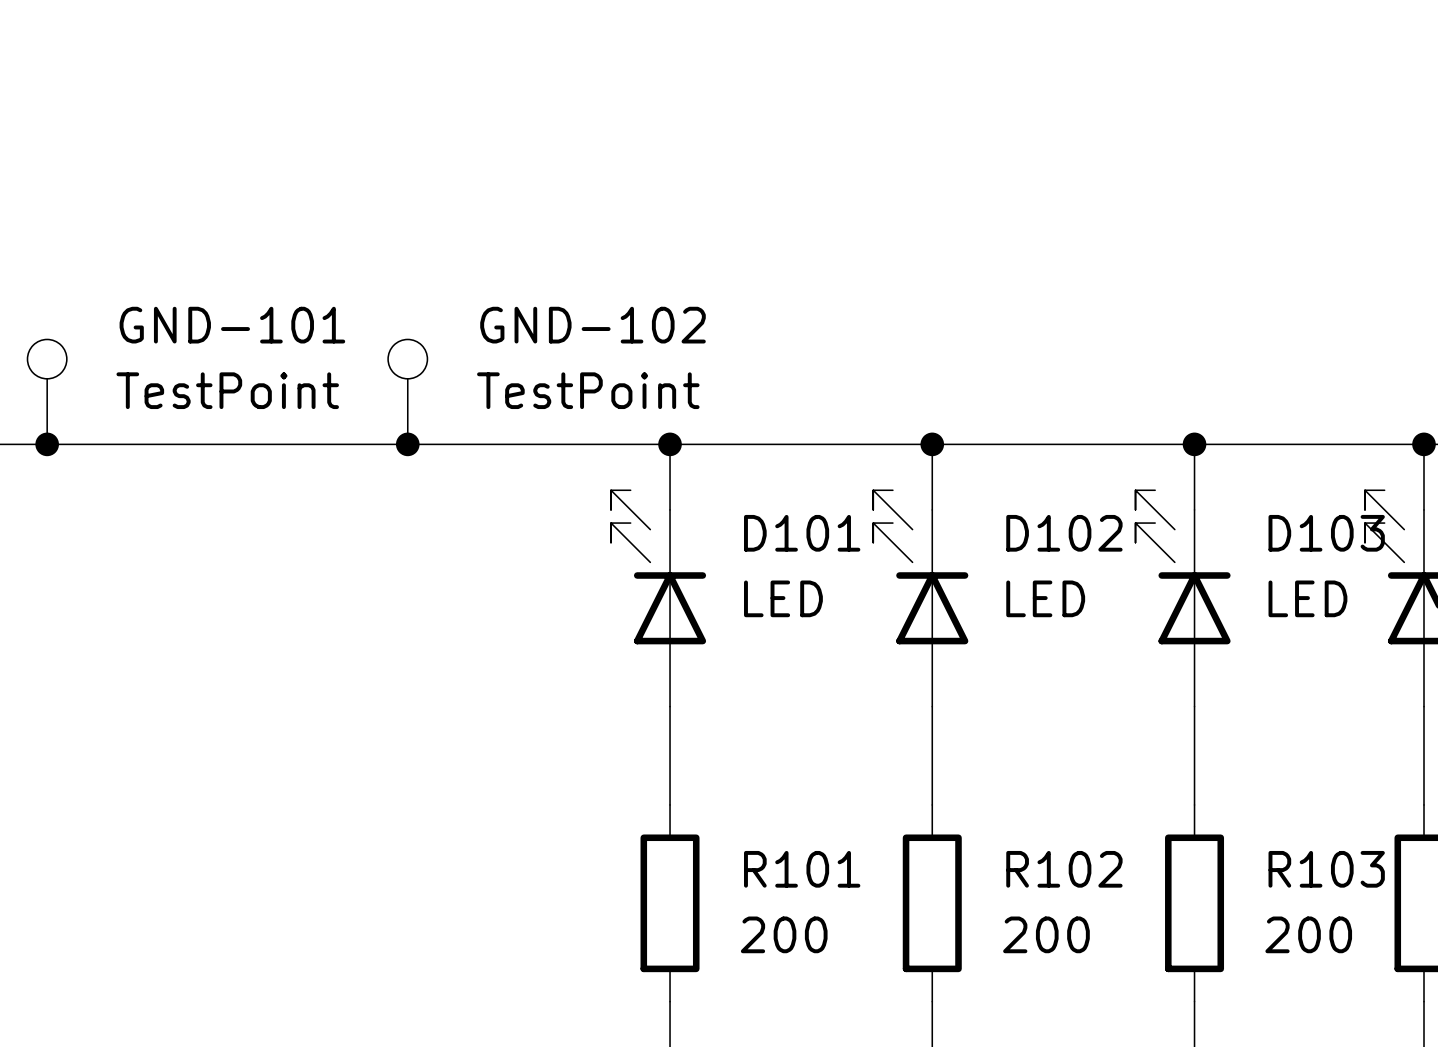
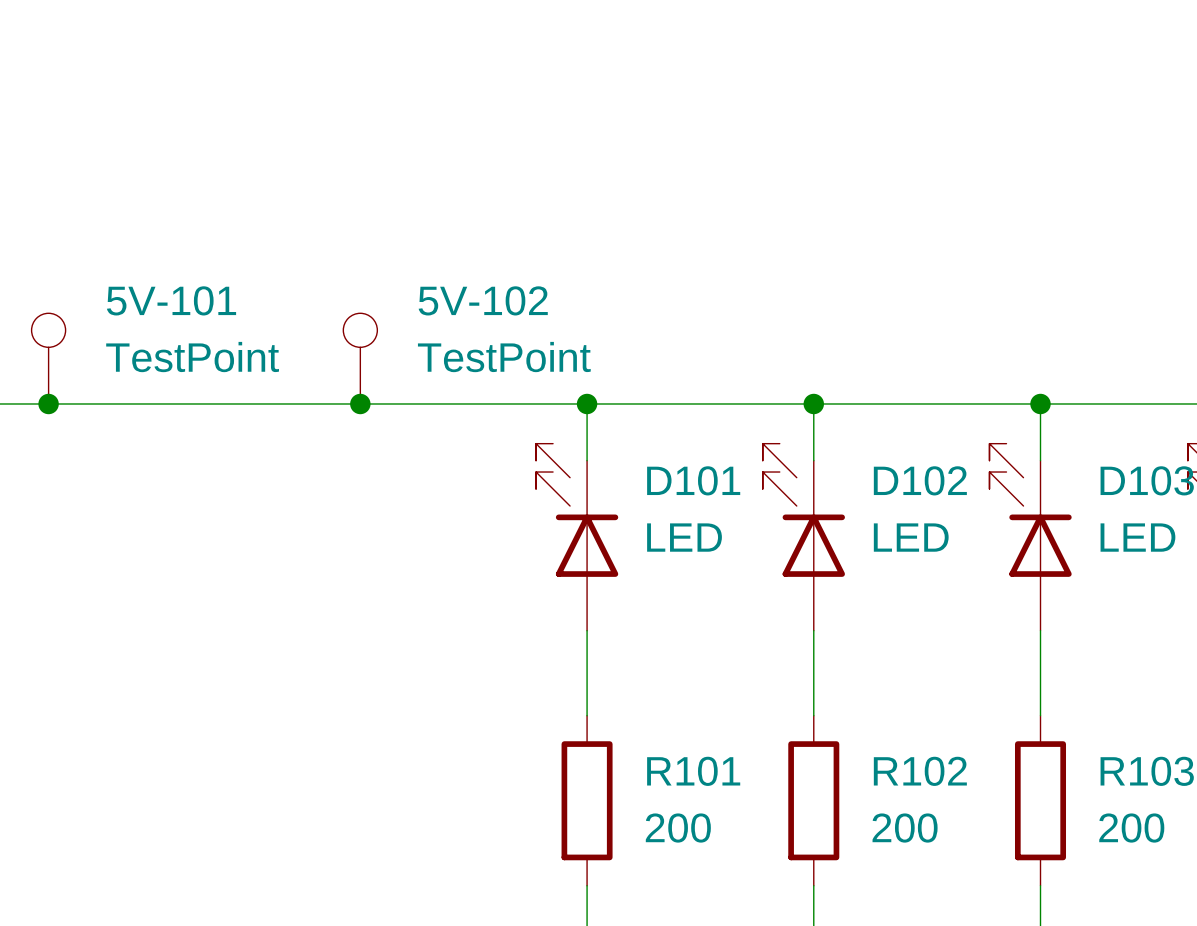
GND-101 name: GND-101 (232, 325) -> 5V-101 (171, 300)
GND-102 name: GND-102 (592, 325) -> 5V-102 (483, 300)

